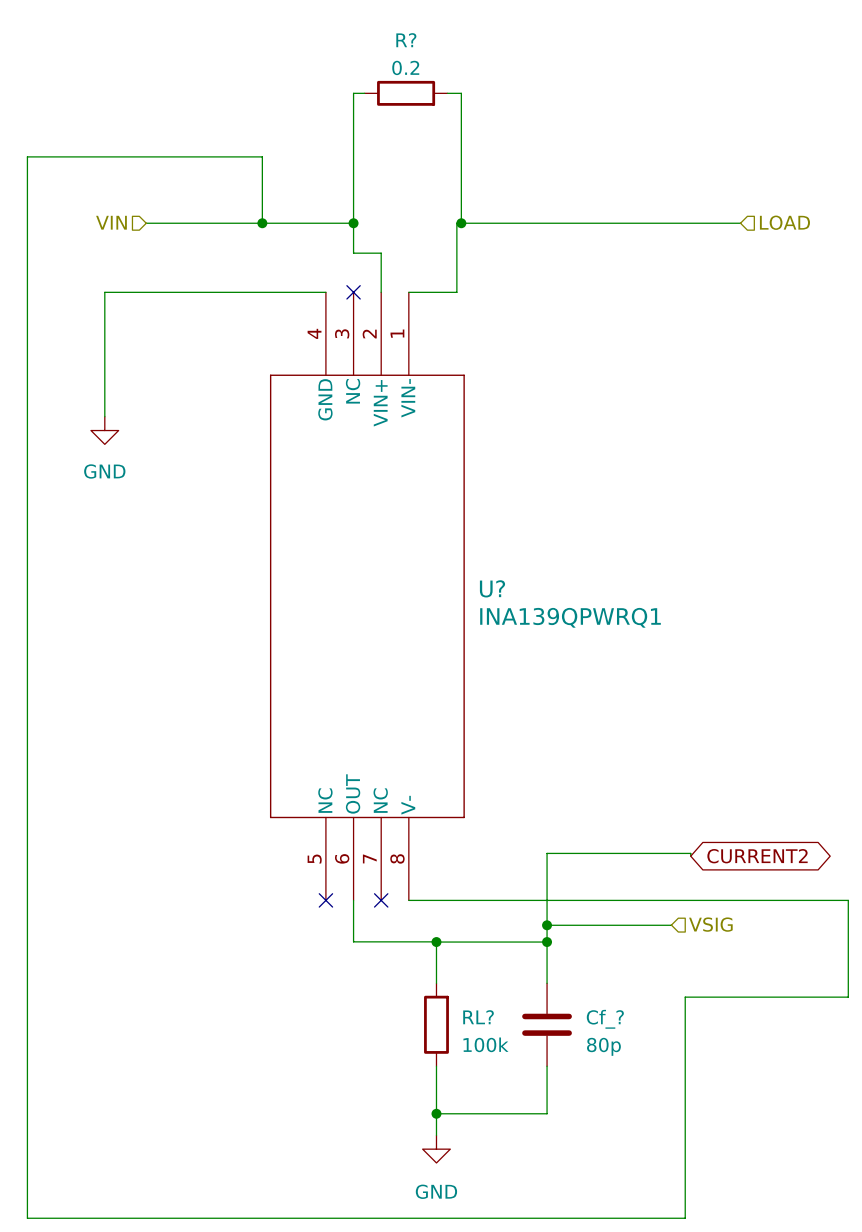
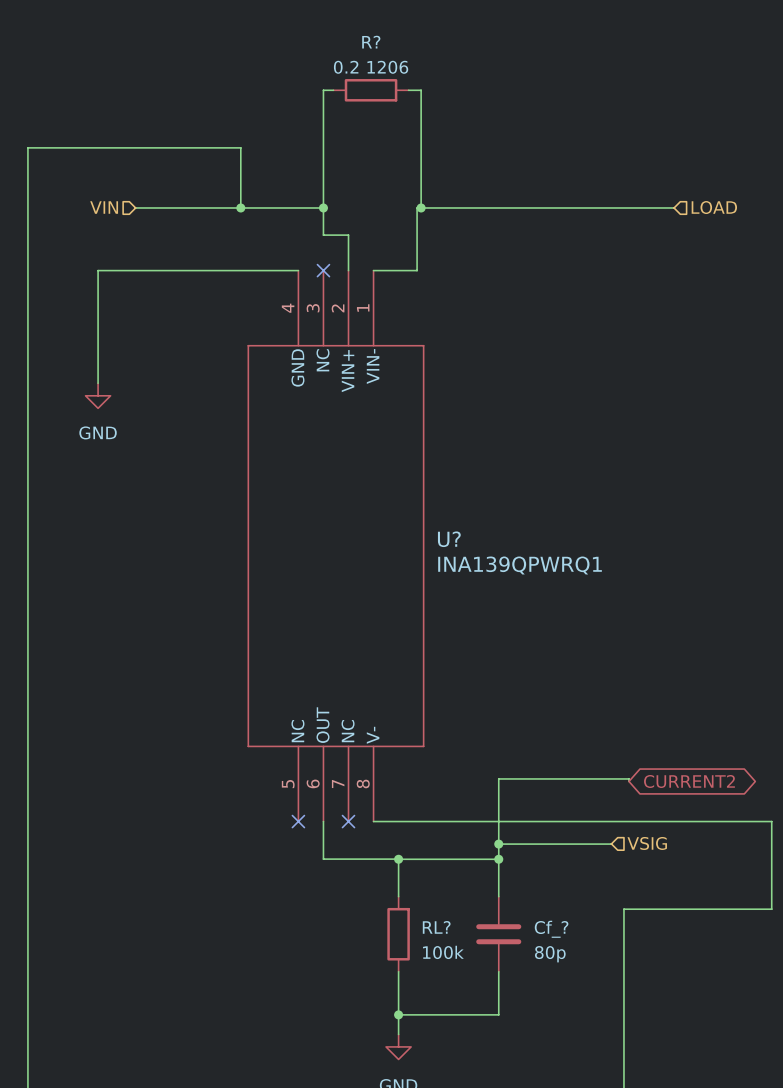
R? value: 0.2 (405, 67) -> 0.2 1206 (371, 67)

